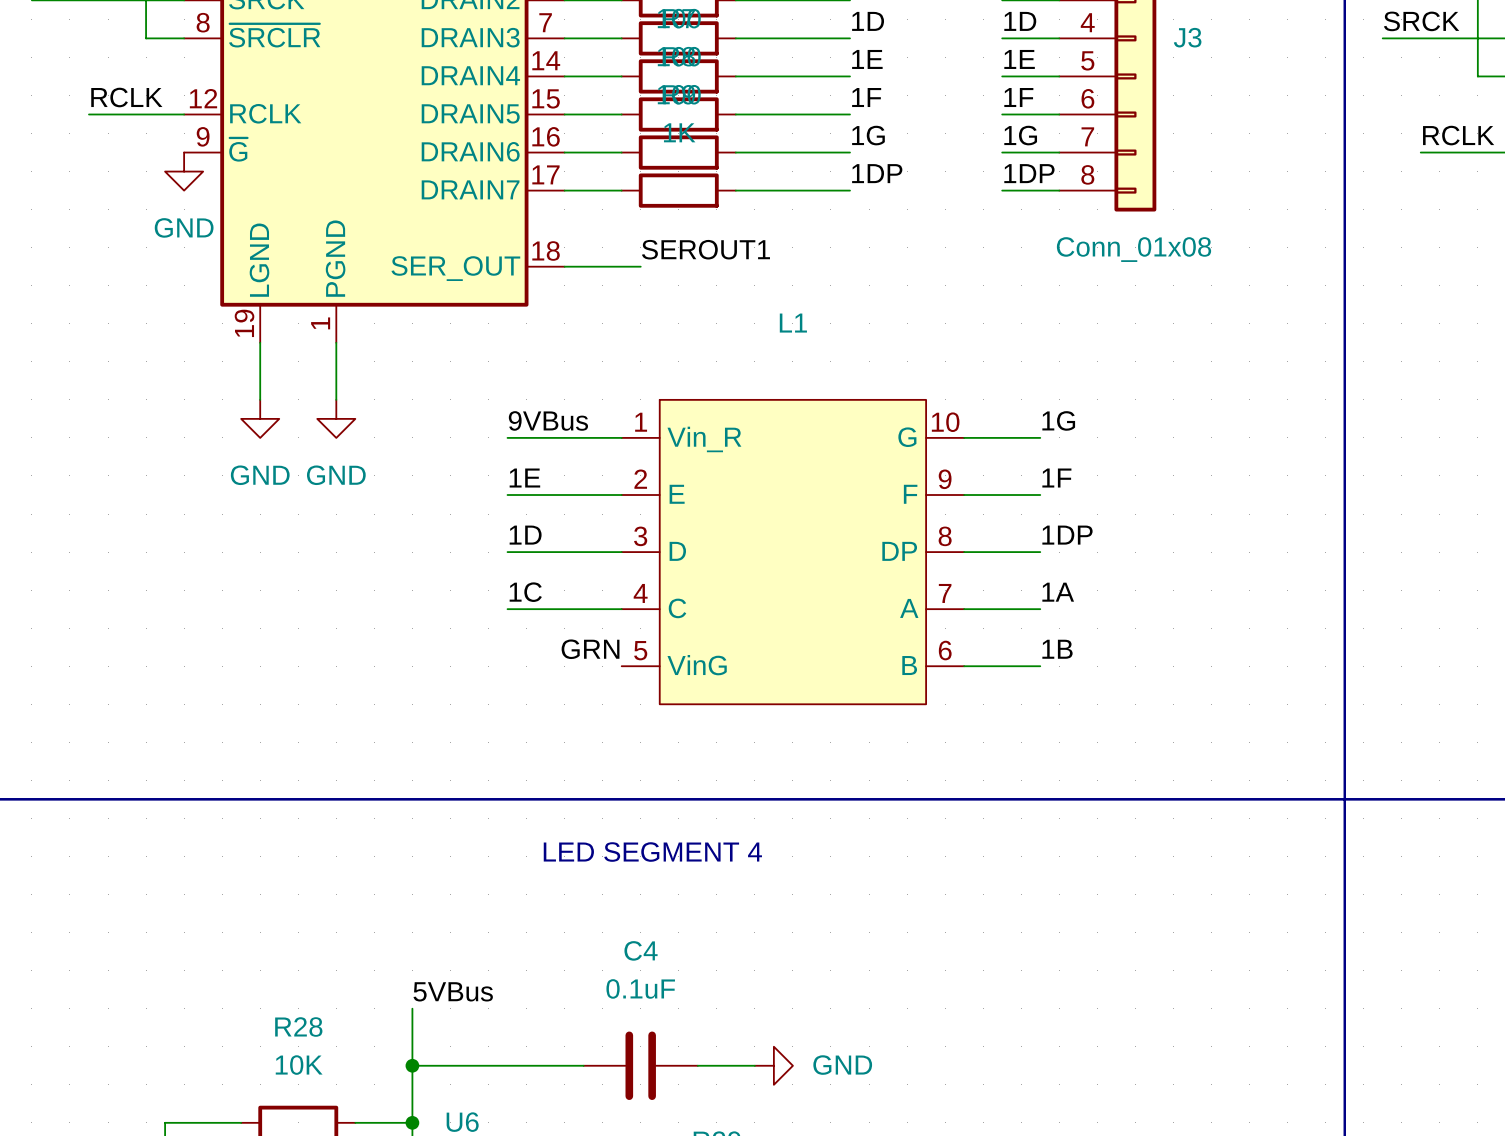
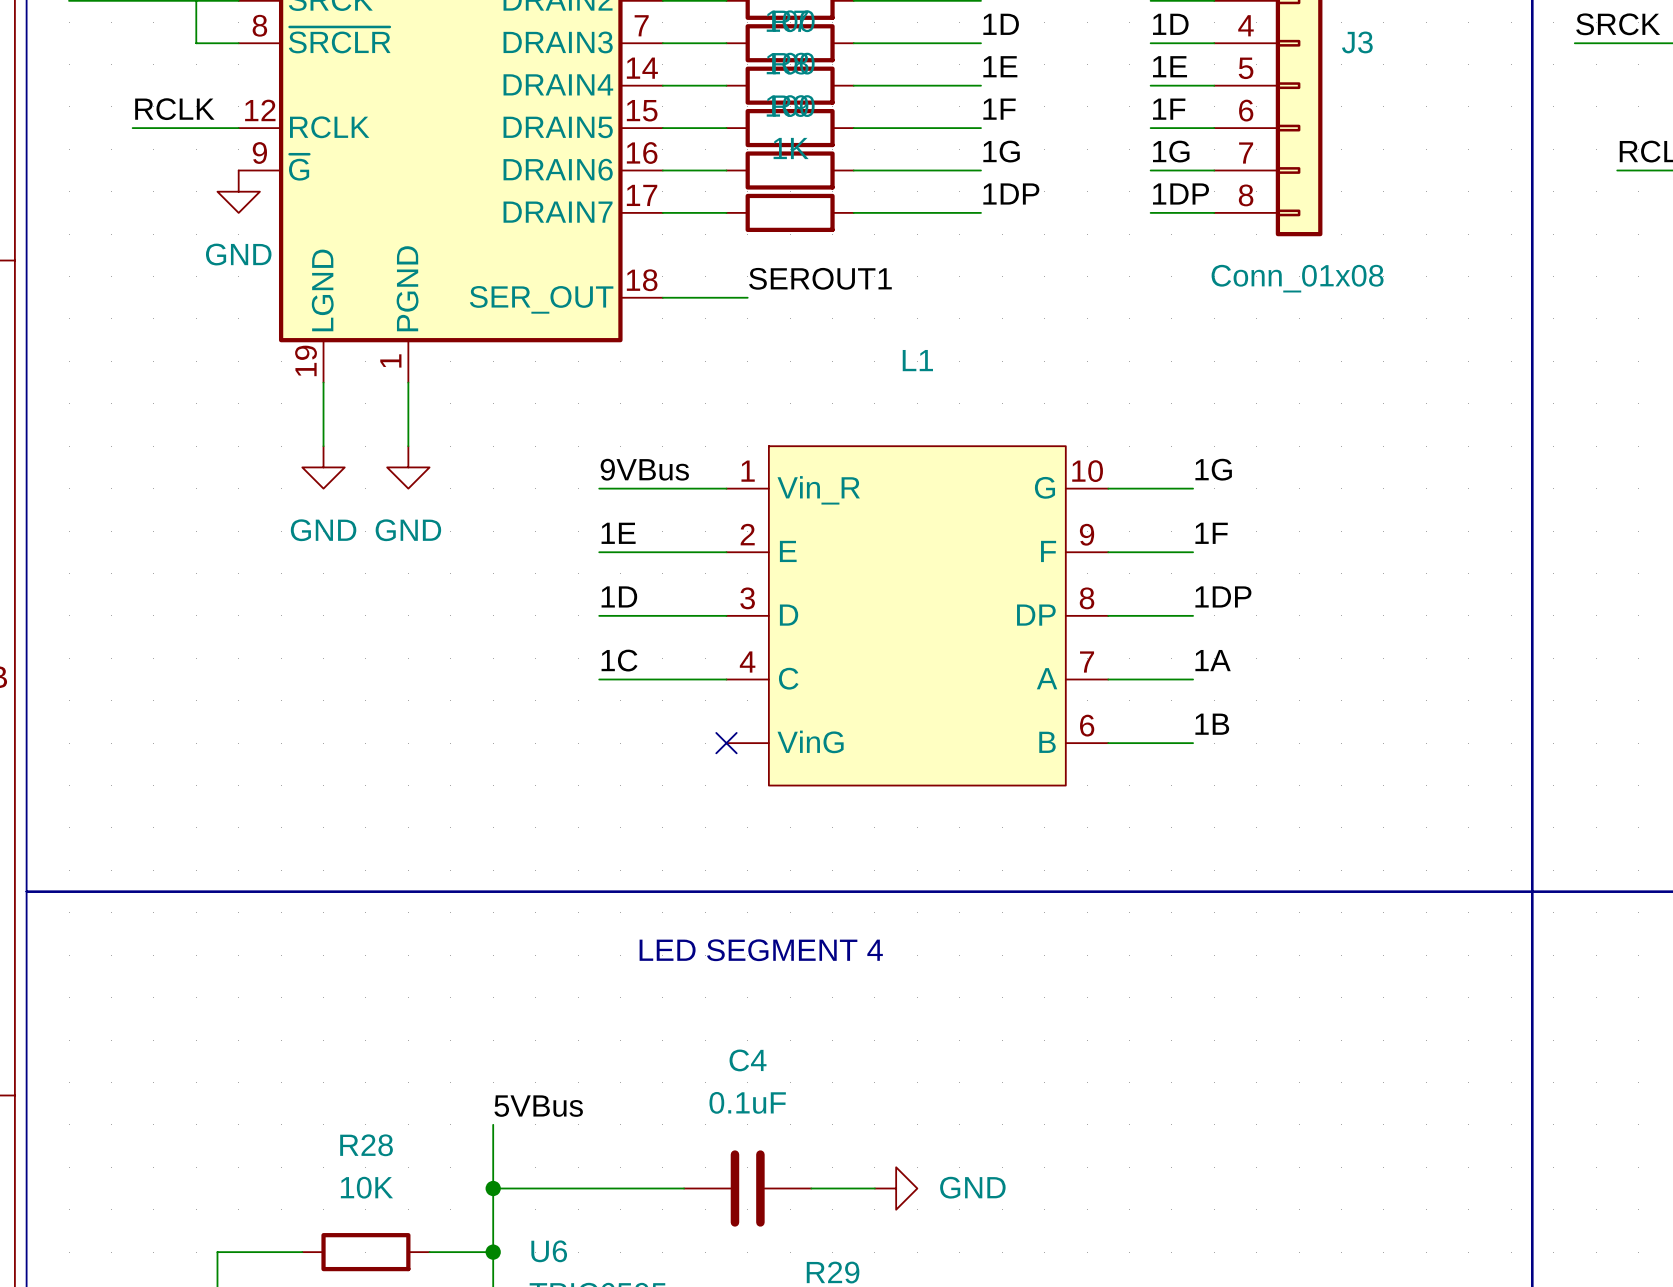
label: GRN (590, 649) -> none
L1 pin number: 5 (640, 650) -> none
no-connect mark: none -> (726, 743)

